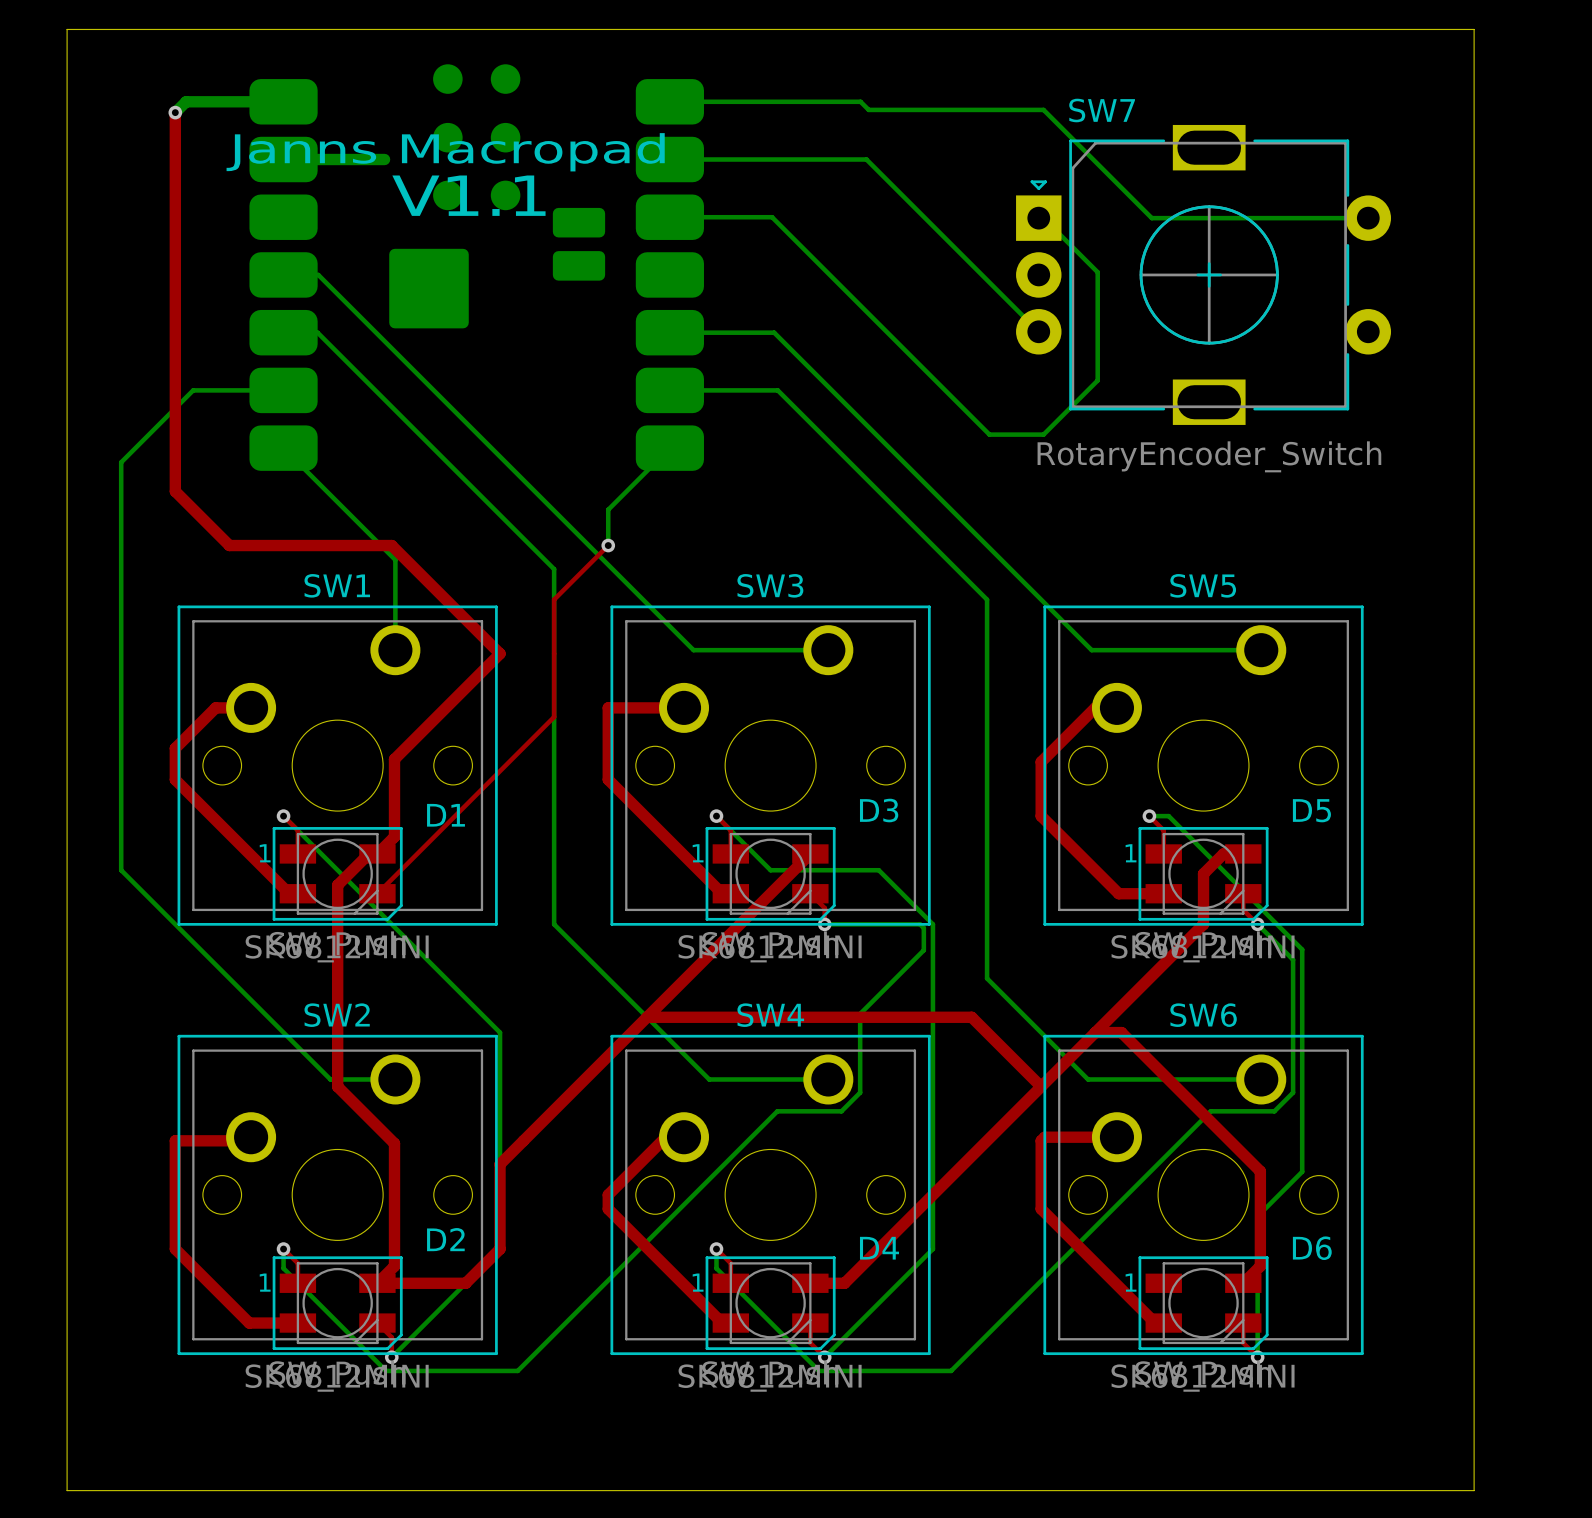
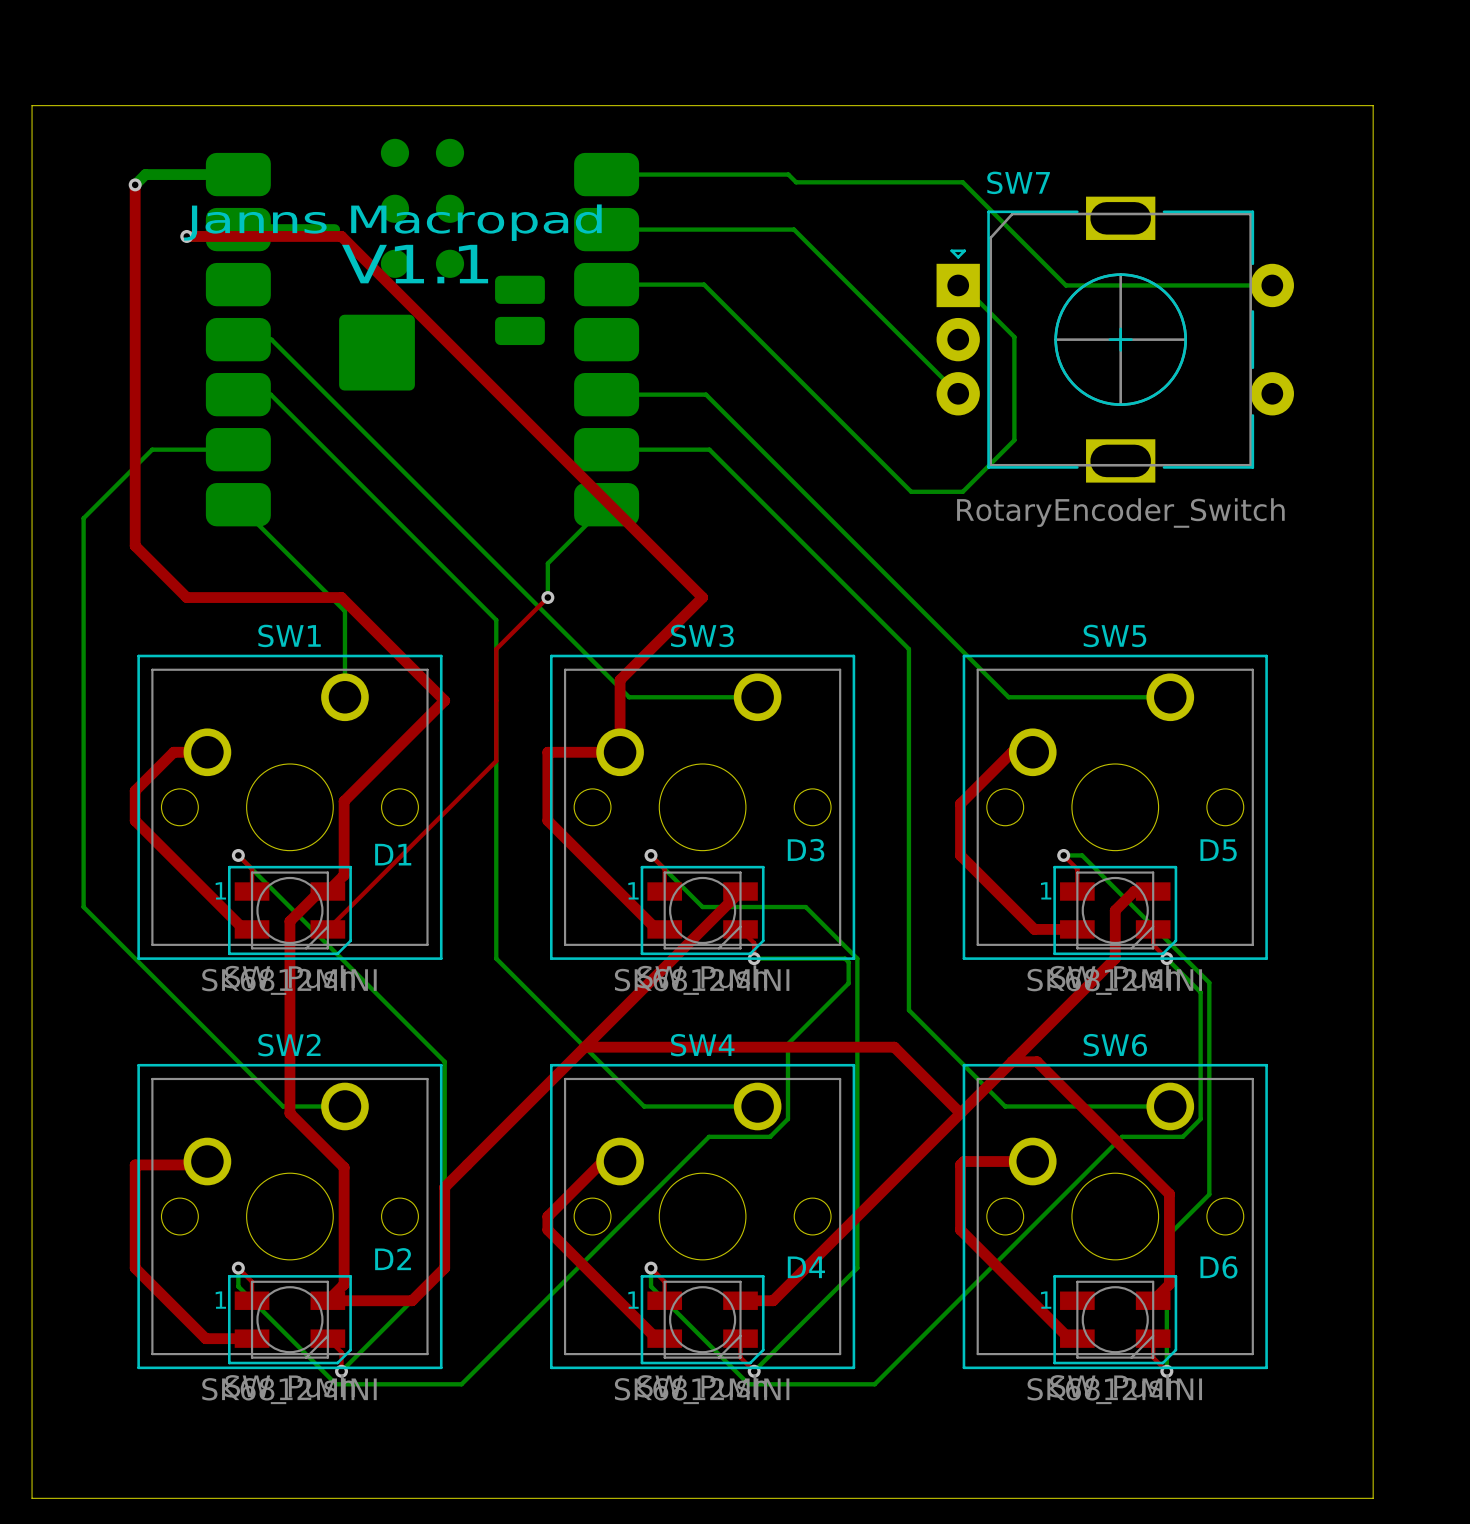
top track: none -> (186, 236) (341, 236) (702, 597) (620, 680) (620, 752)
via: none -> (186, 236)

